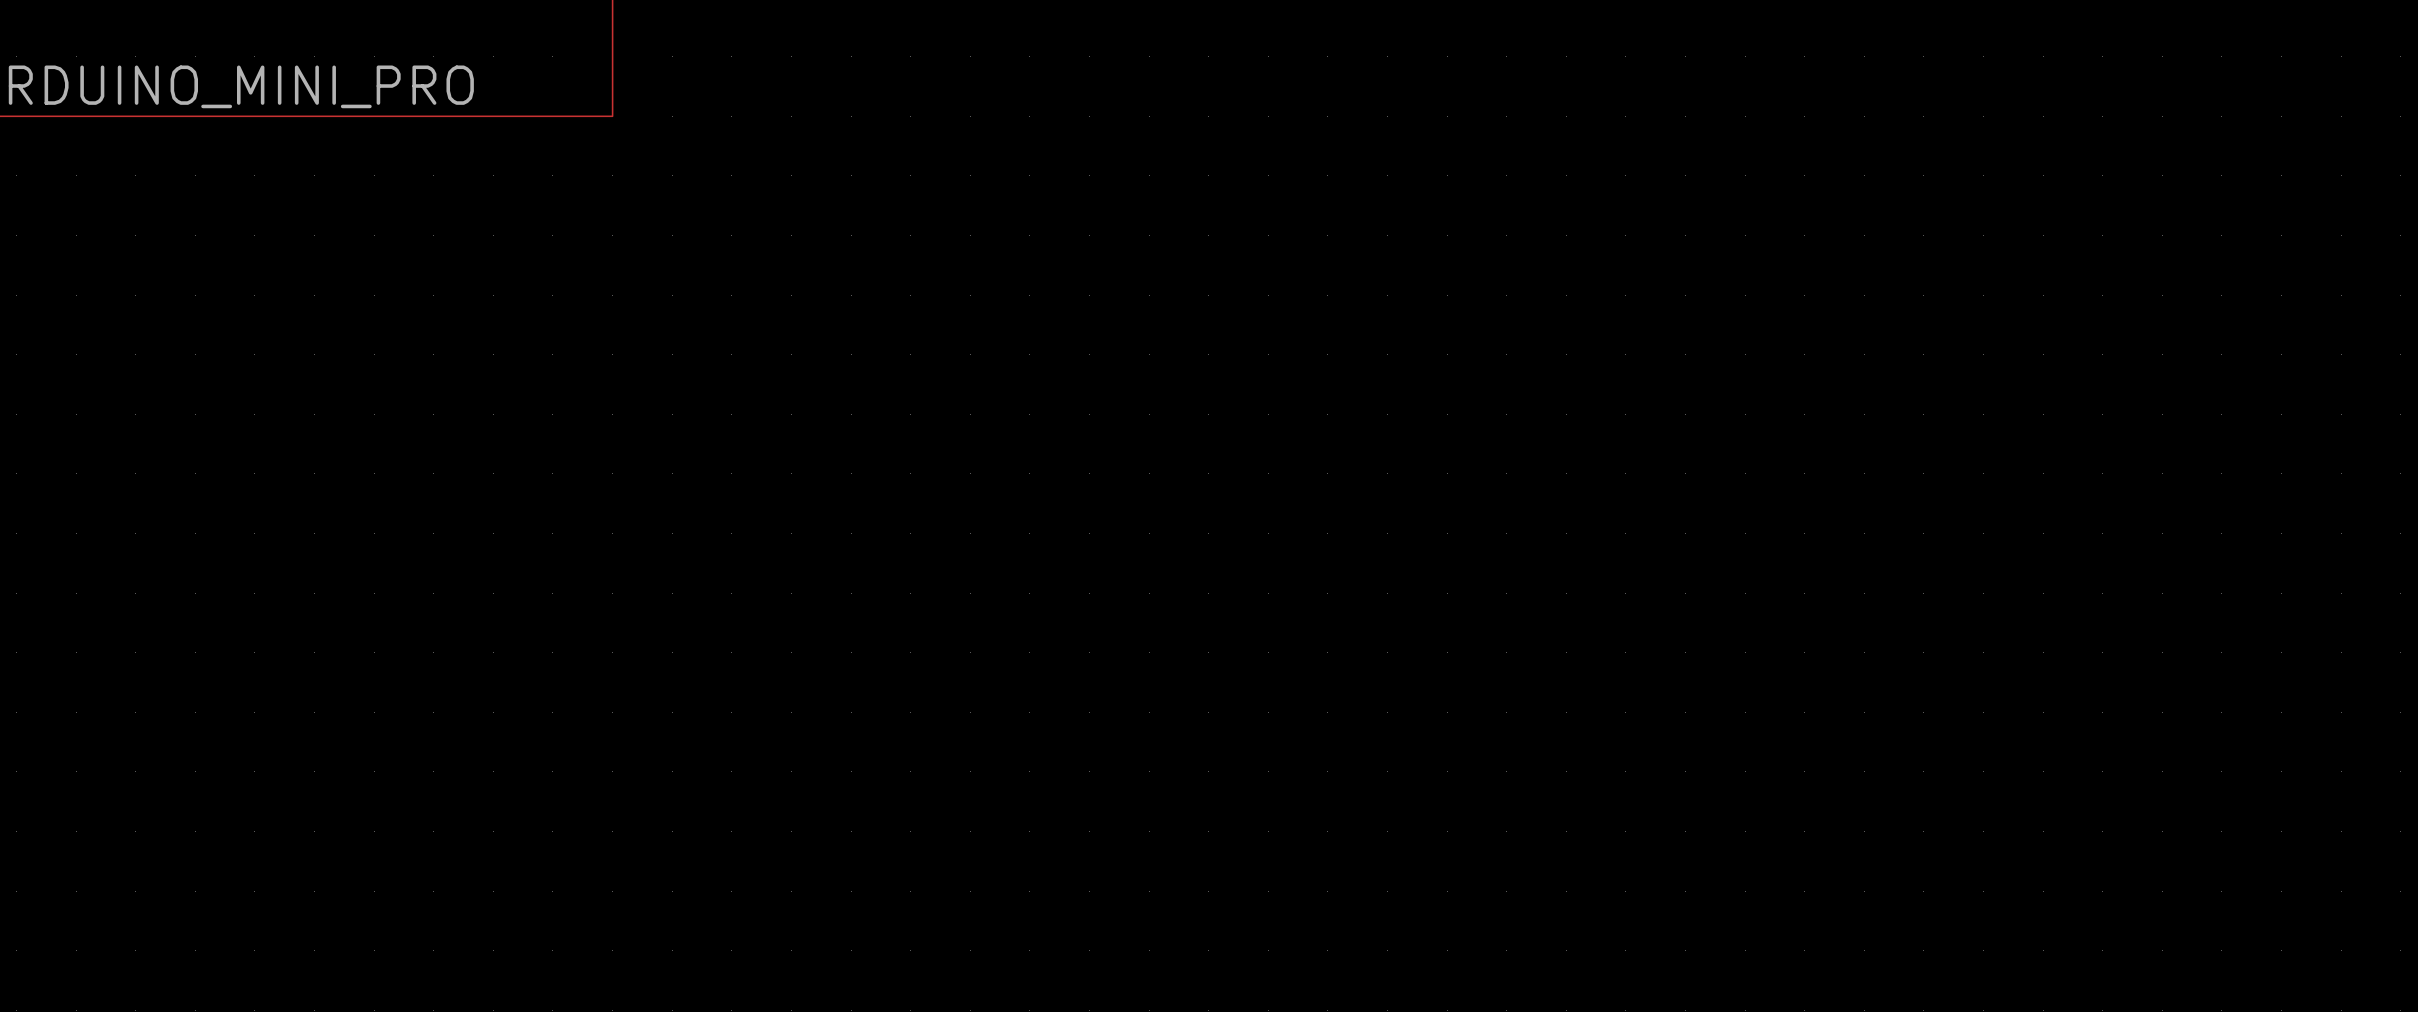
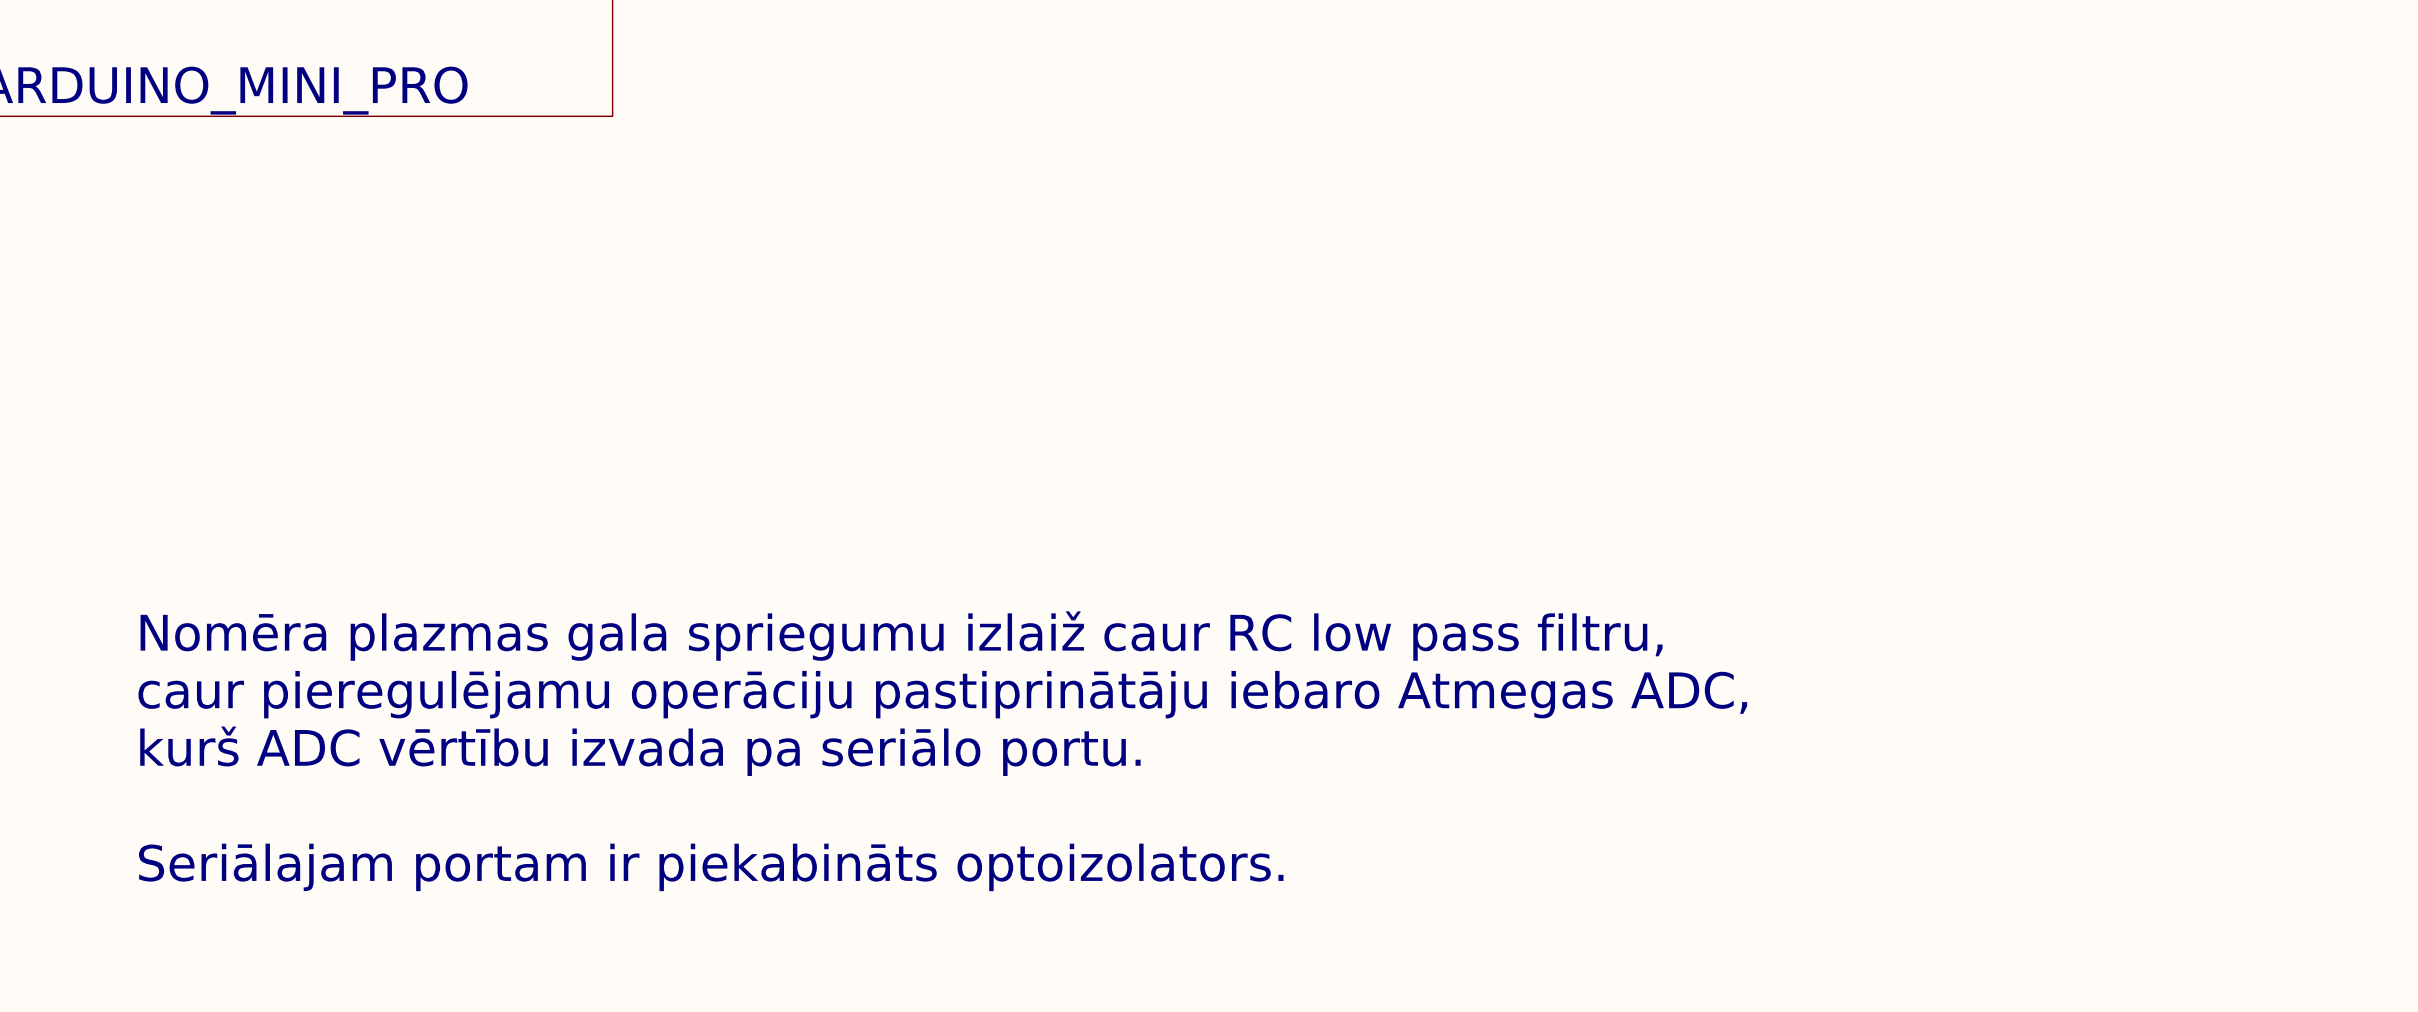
text: none -> Nomēra plazmas gala spriegumu izlaiž caur RC low pass filtru, (901, 636)
text: none -> caur pieregulējamu operāciju pastiprinātāju iebaro Atmegas ADC, (942, 694)
text: none -> kurš ADC vērtību izvada pa seriālo portu. (640, 751)
text: none -> Seriālajam portam ir piekabināts optoizolators. (711, 867)

